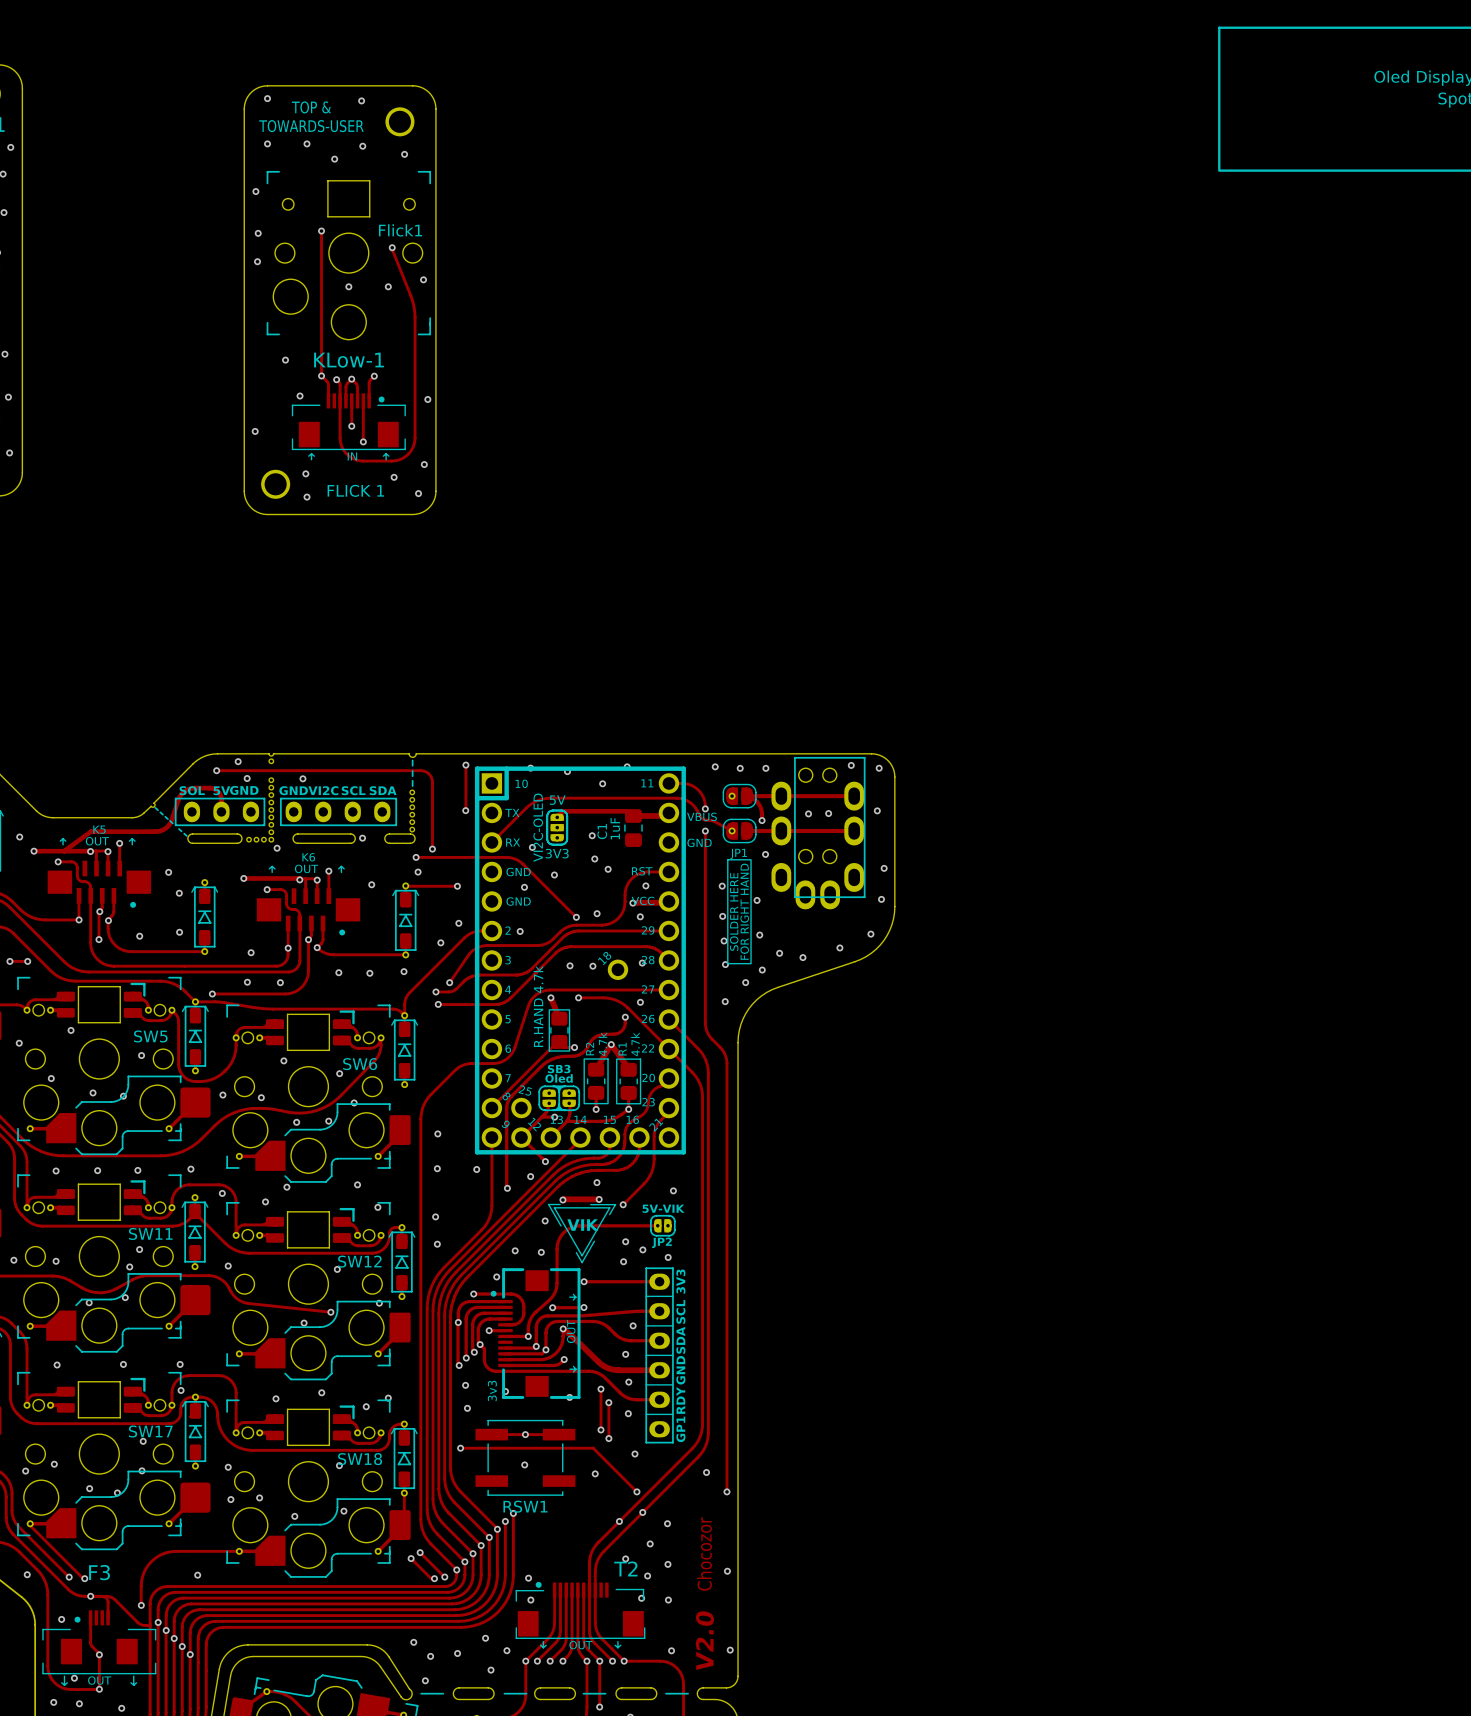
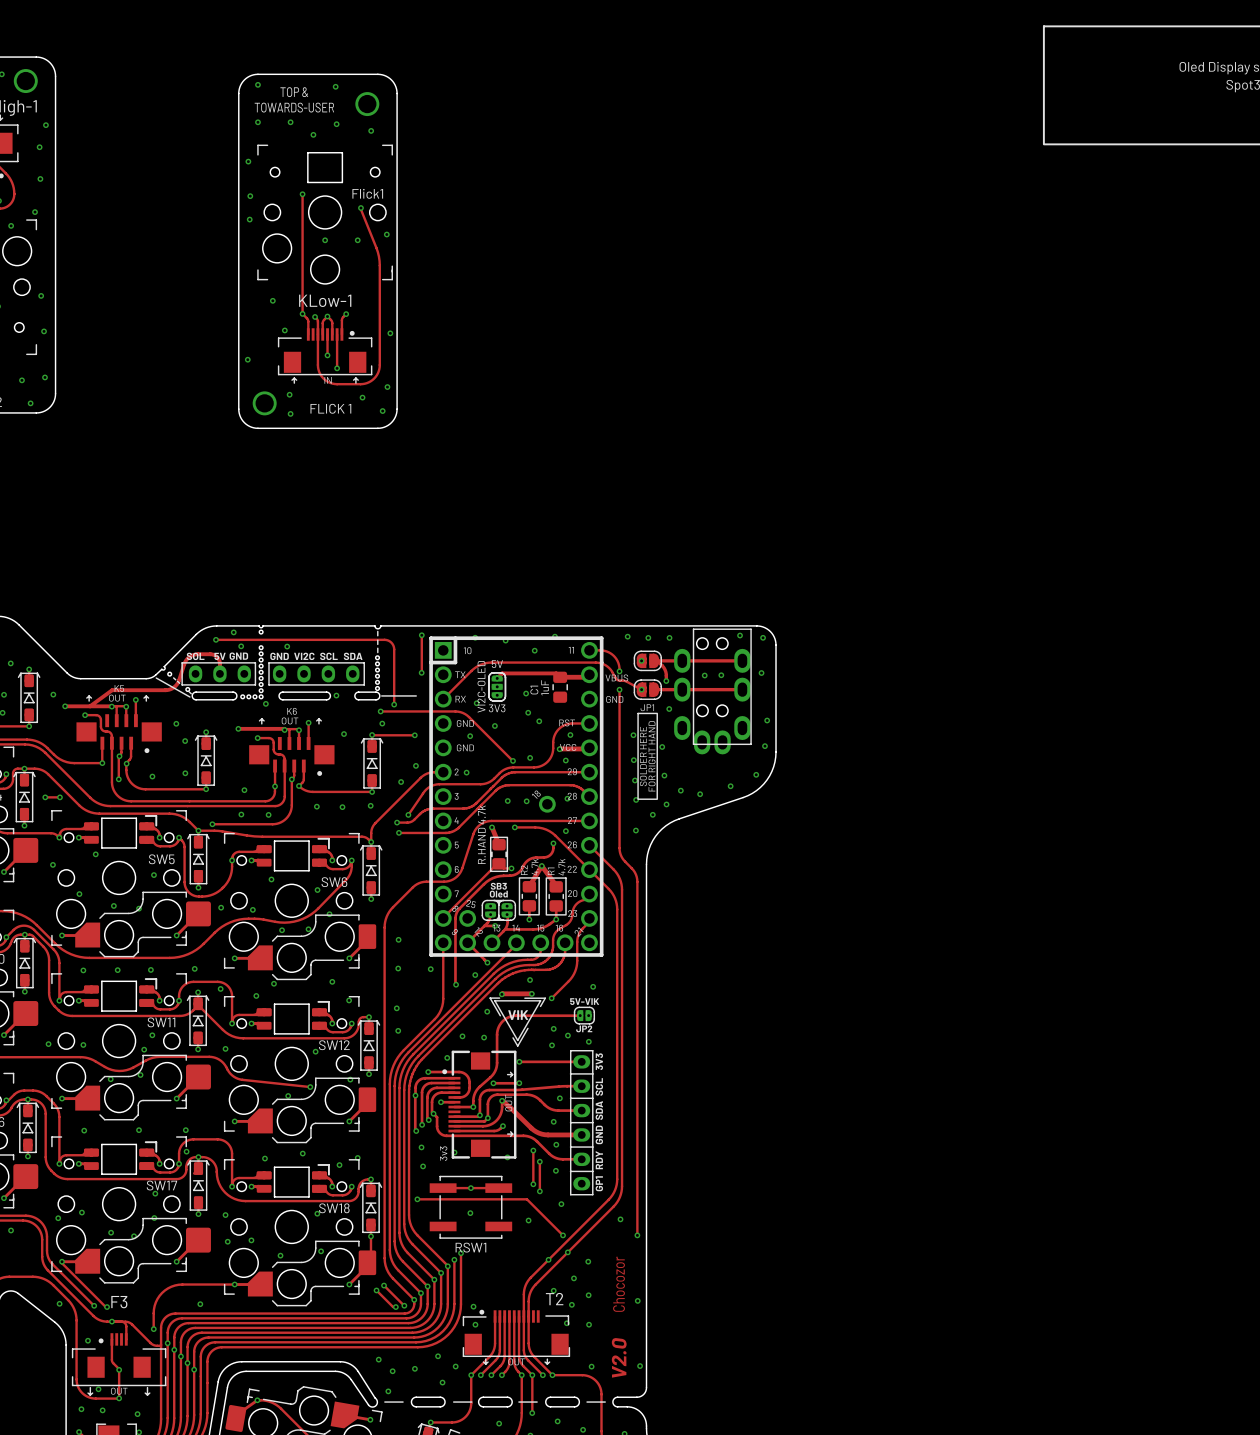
line: (155, 807) (157, 810) -> none
round board edge: none -> [167, 671, 173, 677]
line: (160, 812) (162, 814) -> none
line: none -> (156, 678) (189, 697)
line: (178, 828) (181, 831) -> none
round board edge: none -> [185, 687, 191, 692]
line: none -> (381, 695) (416, 695)

